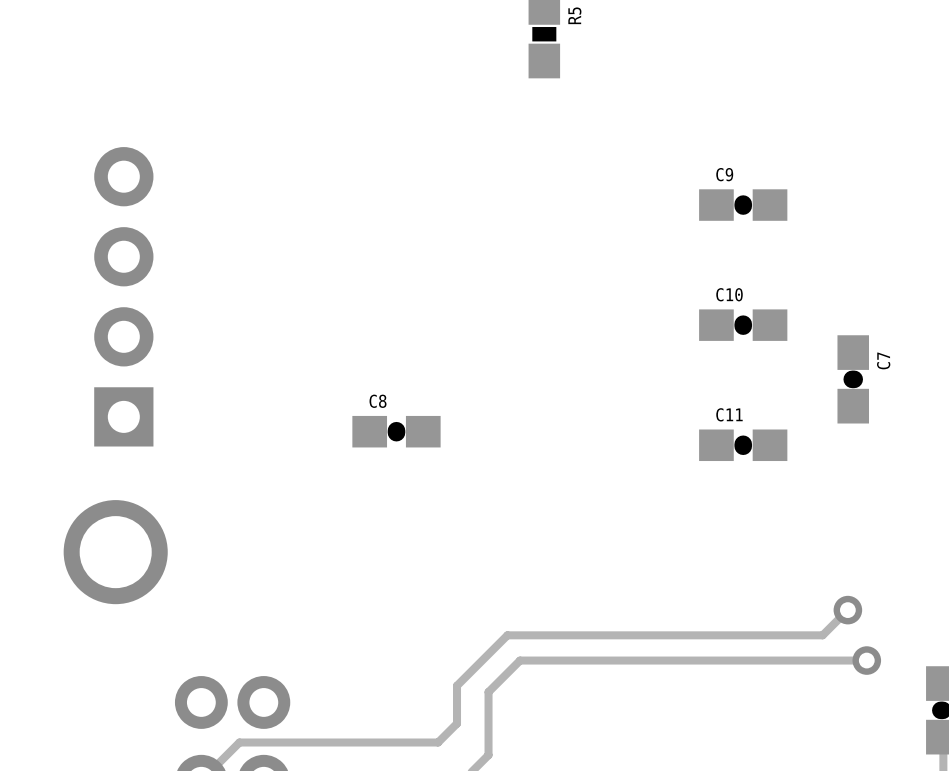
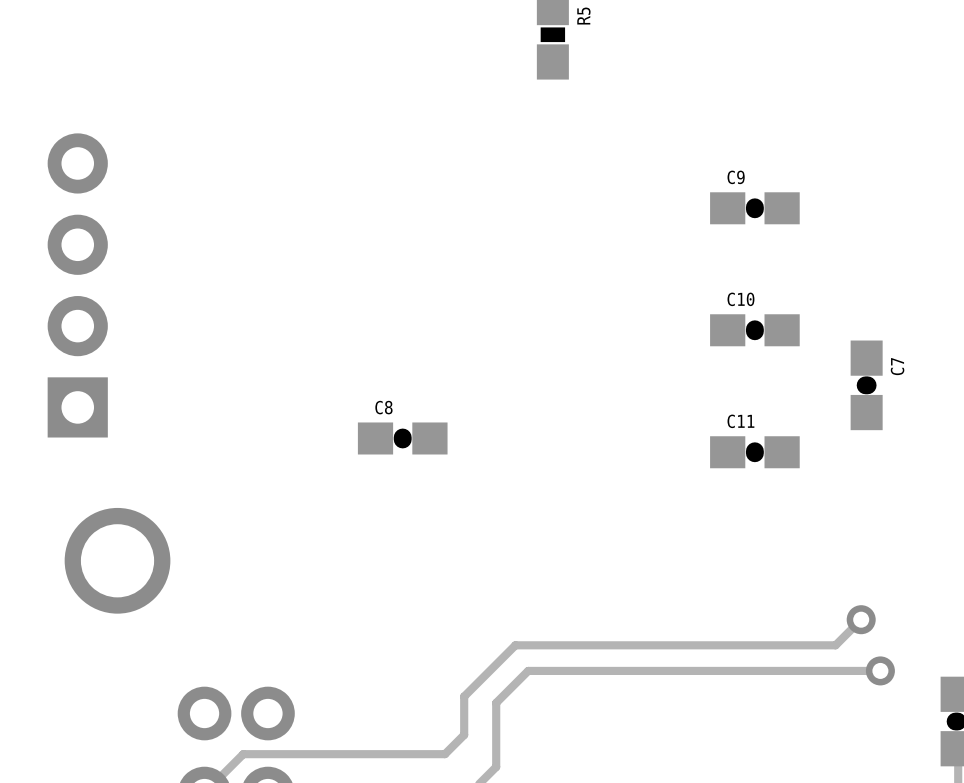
part position: (123, 296) -> (77, 285)

